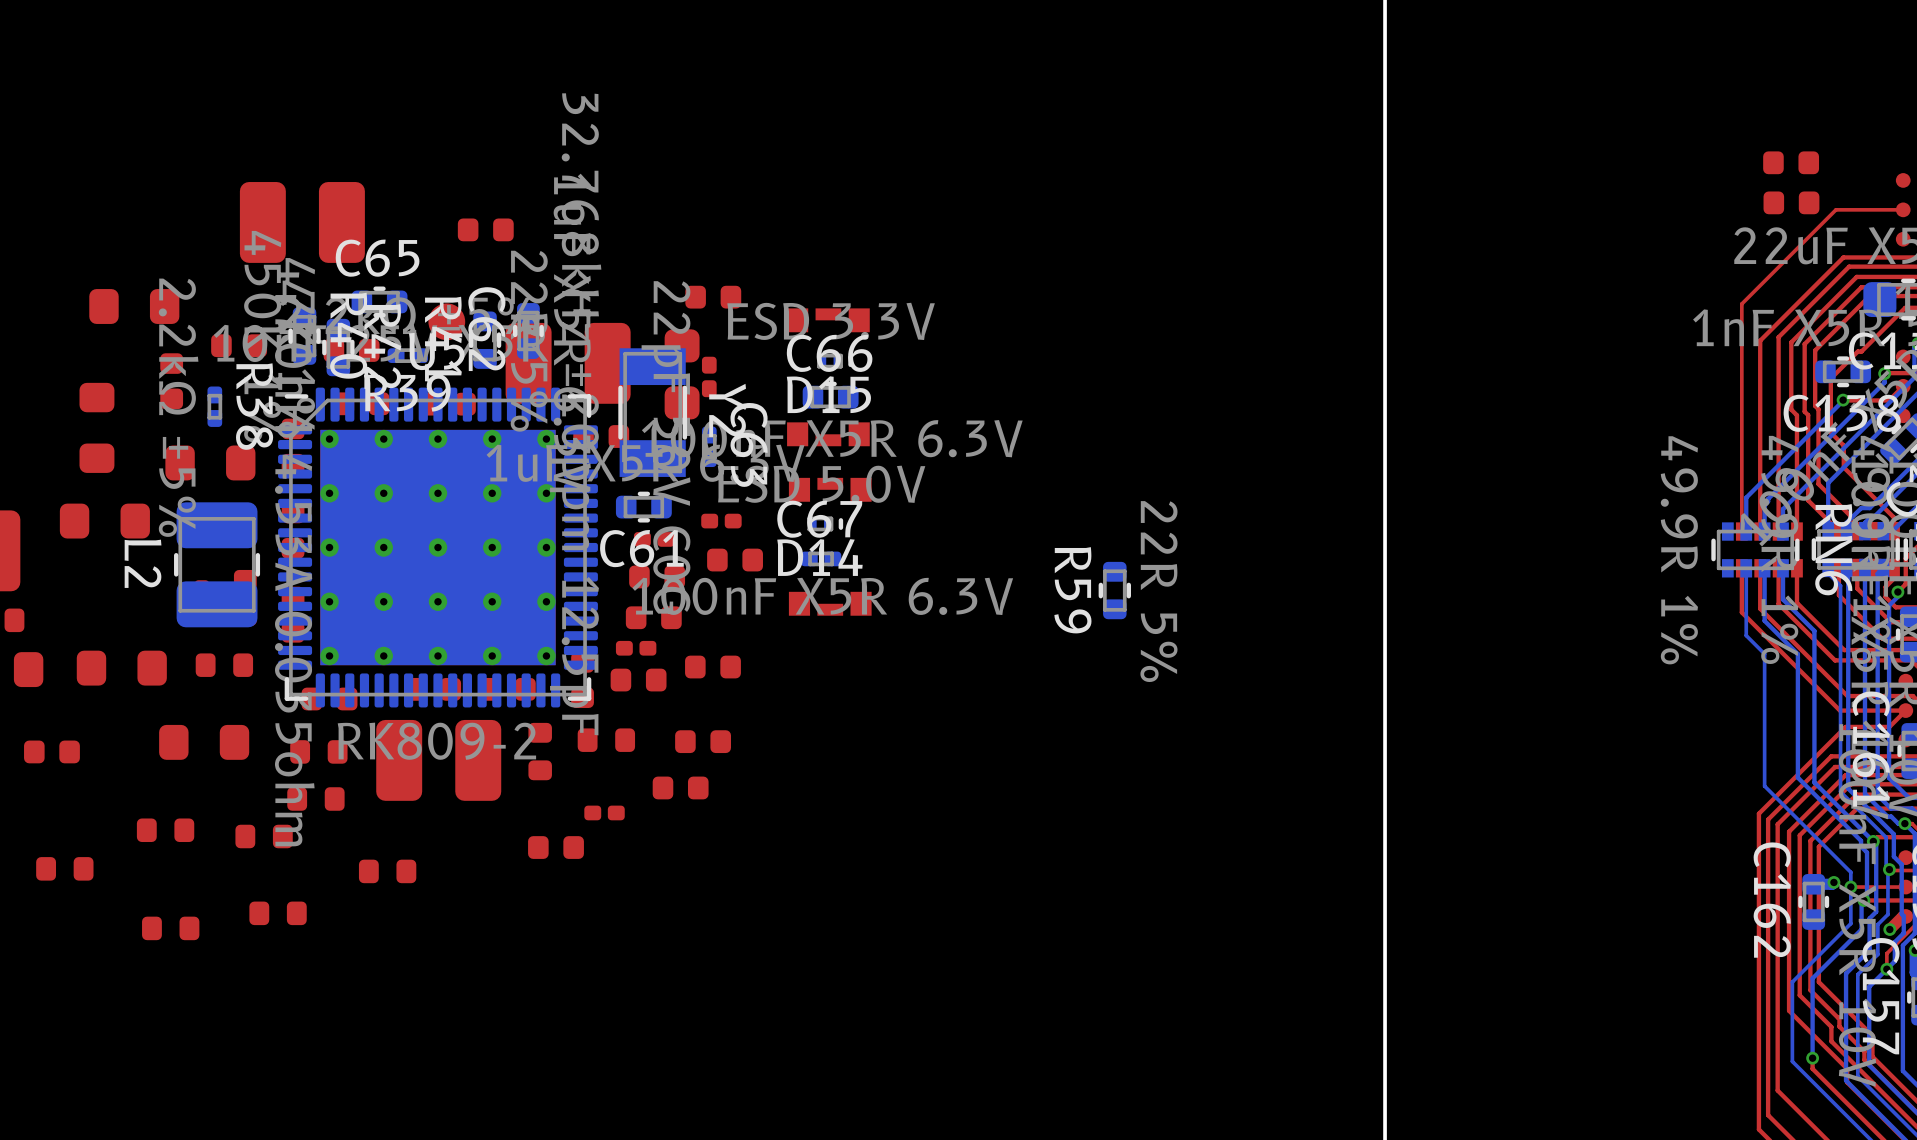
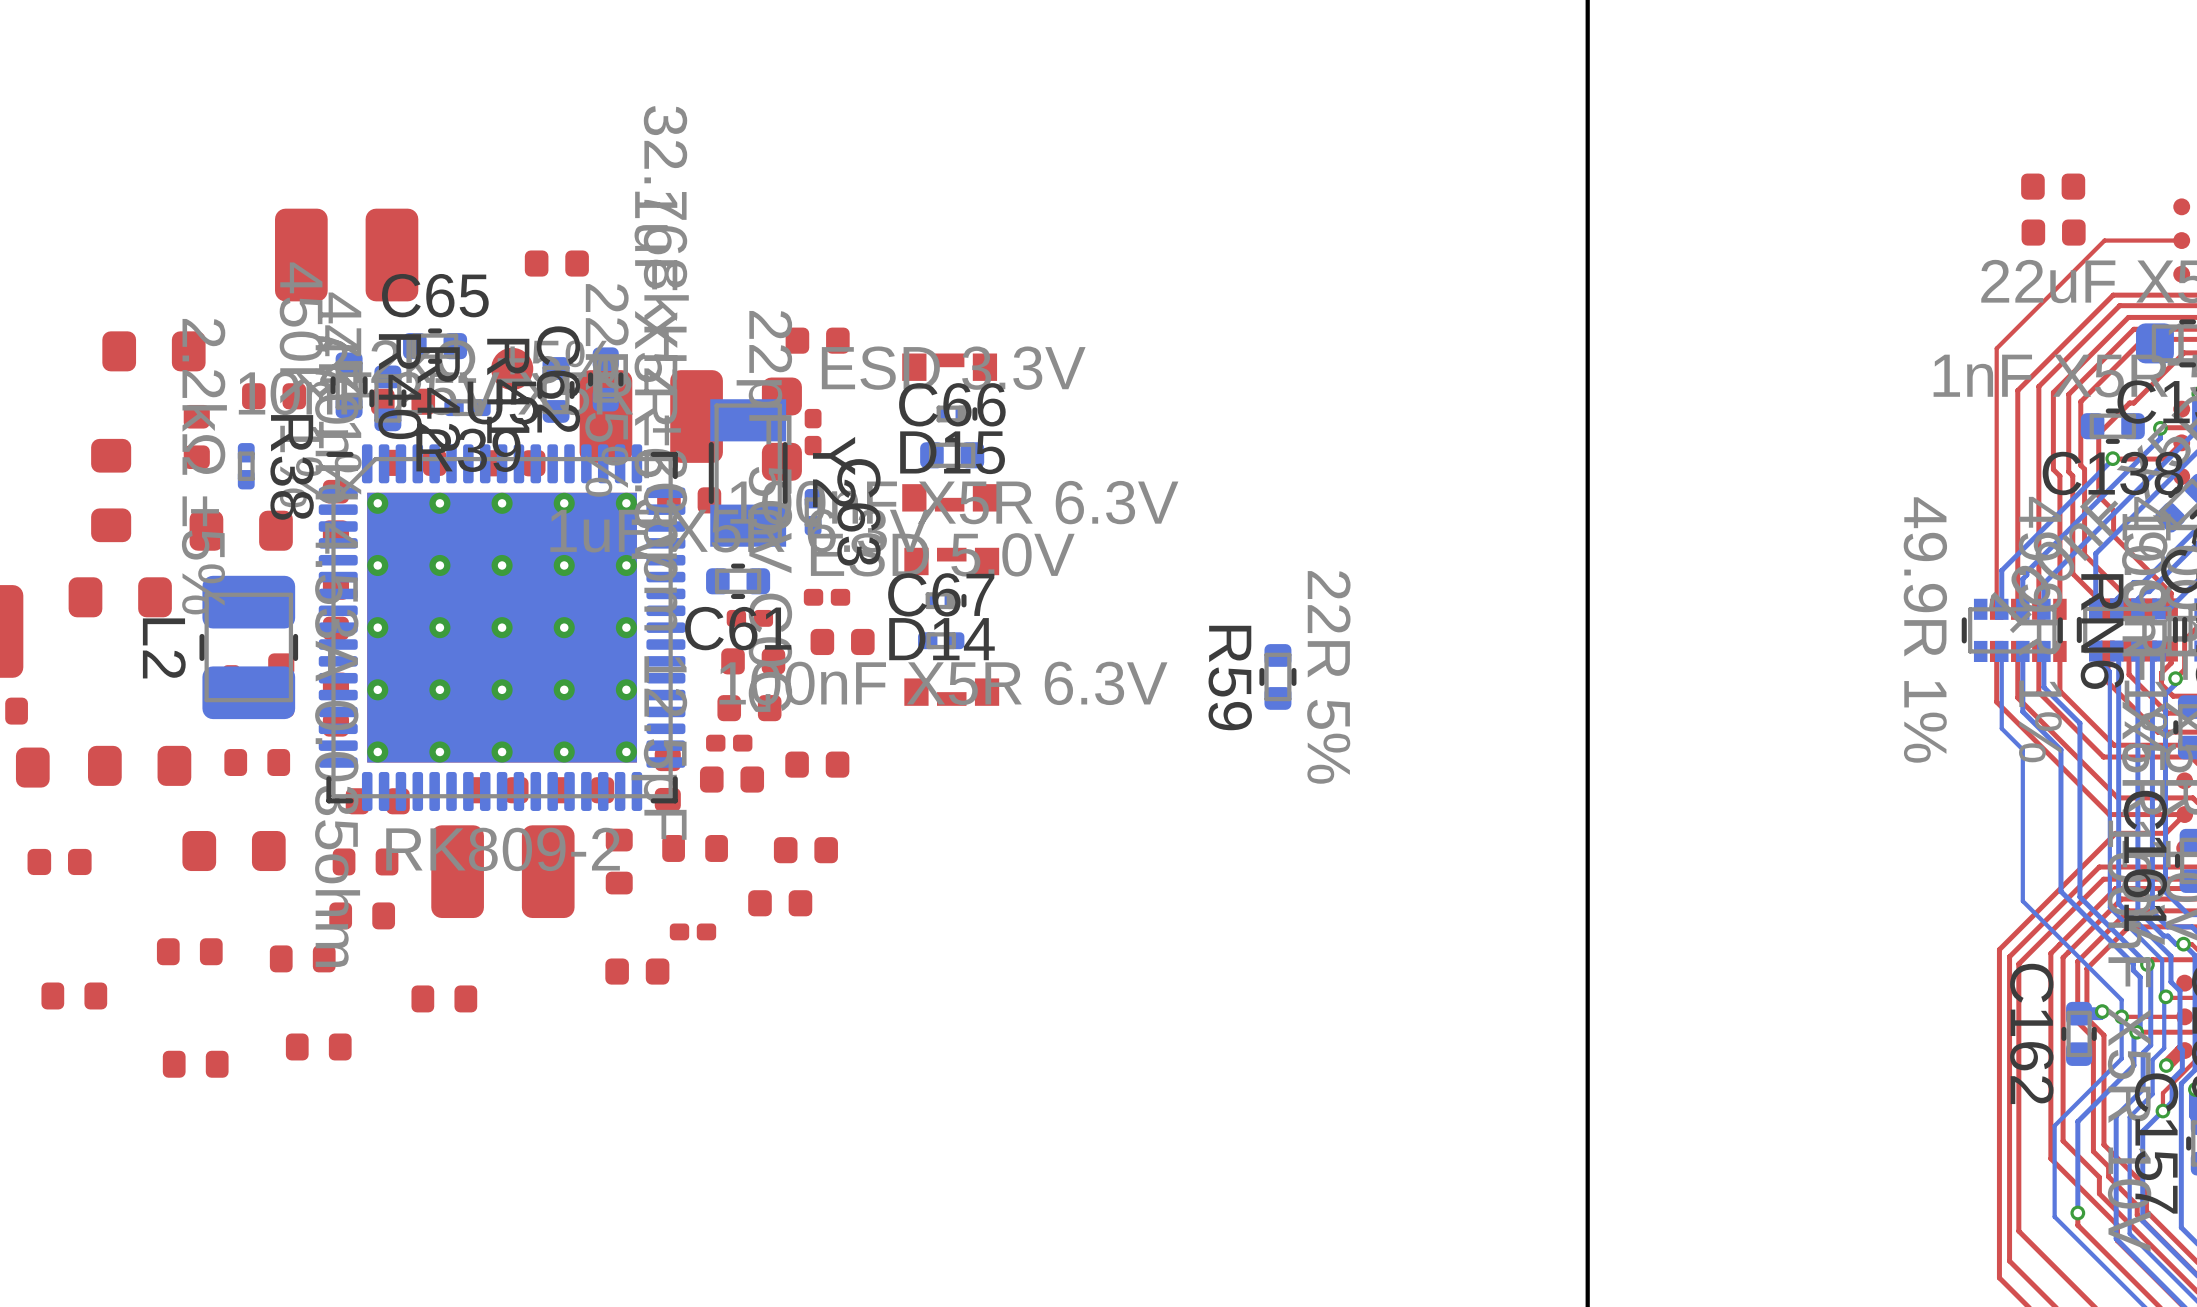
top track: (1758, 813) (1758, 1129) -> (2016, 932) (1999, 949) (1999, 1277) (2016, 1294)
top track: (1768, 819) (1768, 1115) -> (2026, 939) (2009, 956) (2009, 1261) (2026, 1278)
top track: (1777, 824) (1777, 1090) -> (2037, 944) (2018, 963) (2018, 1231) (2037, 1250)
top track: (1812, 838) (1810, 840) (1810, 990) (1839, 1017) -> (2077, 961) (2077, 1022) (2093, 1037) (2093, 1151) (2108, 1166)
top track: (1820, 845) (1818, 846) (1818, 982) (1835, 998) -> (2086, 968) (2086, 1018) (2103, 1035) (2103, 1144)

